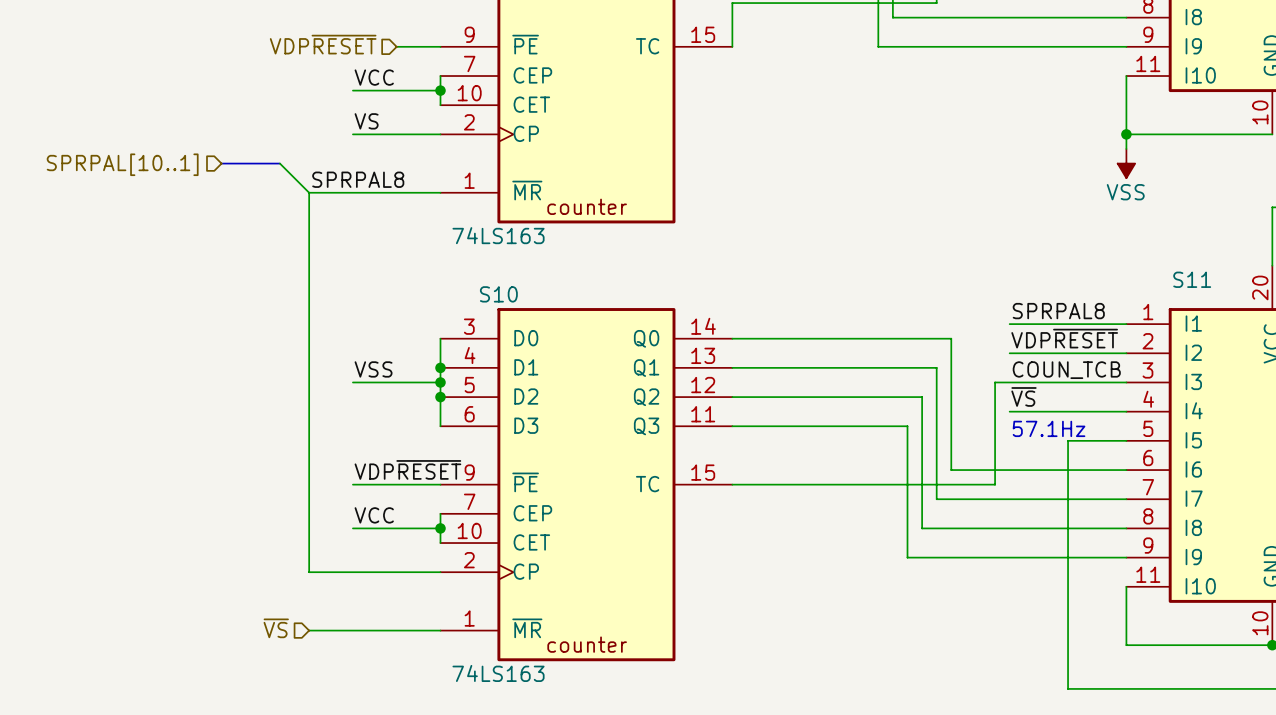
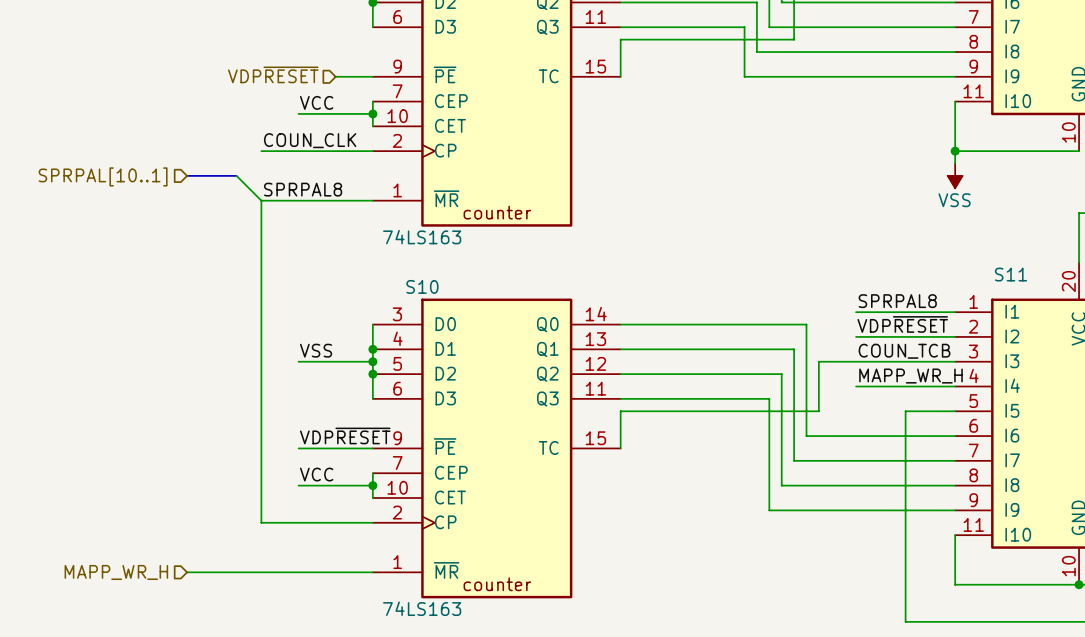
label: VS (366, 121) -> none
label: none -> COUN_CLK (310, 140)
wire: none -> (261, 151) (298, 151)
wire: (995, 382) (995, 484) (732, 484) -> (843, 361) (818, 361) (818, 411) (620, 411) (620, 448)
label: ~{VS} (1023, 396) -> MAPP_WR_H (911, 376)
text: 57.1Hz (1049, 428) -> none
hierarchical label: ~{VS} (276, 628) -> none
hierarchical label: none -> MAPP_WR_H (116, 572)
wire: none -> (187, 572) (261, 572)

